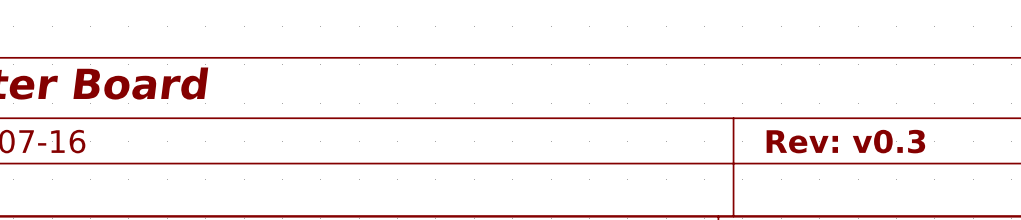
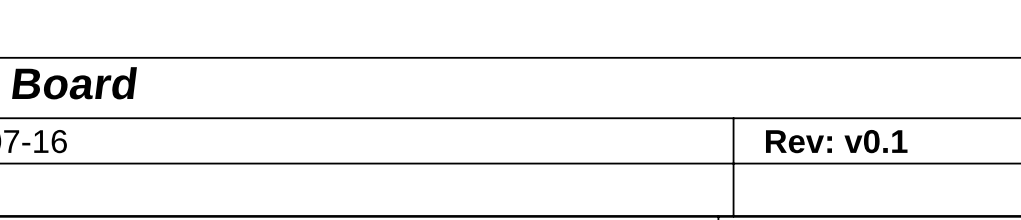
title block: Rev: v0.3 (845, 141) -> Rev: v0.1 (836, 141)

